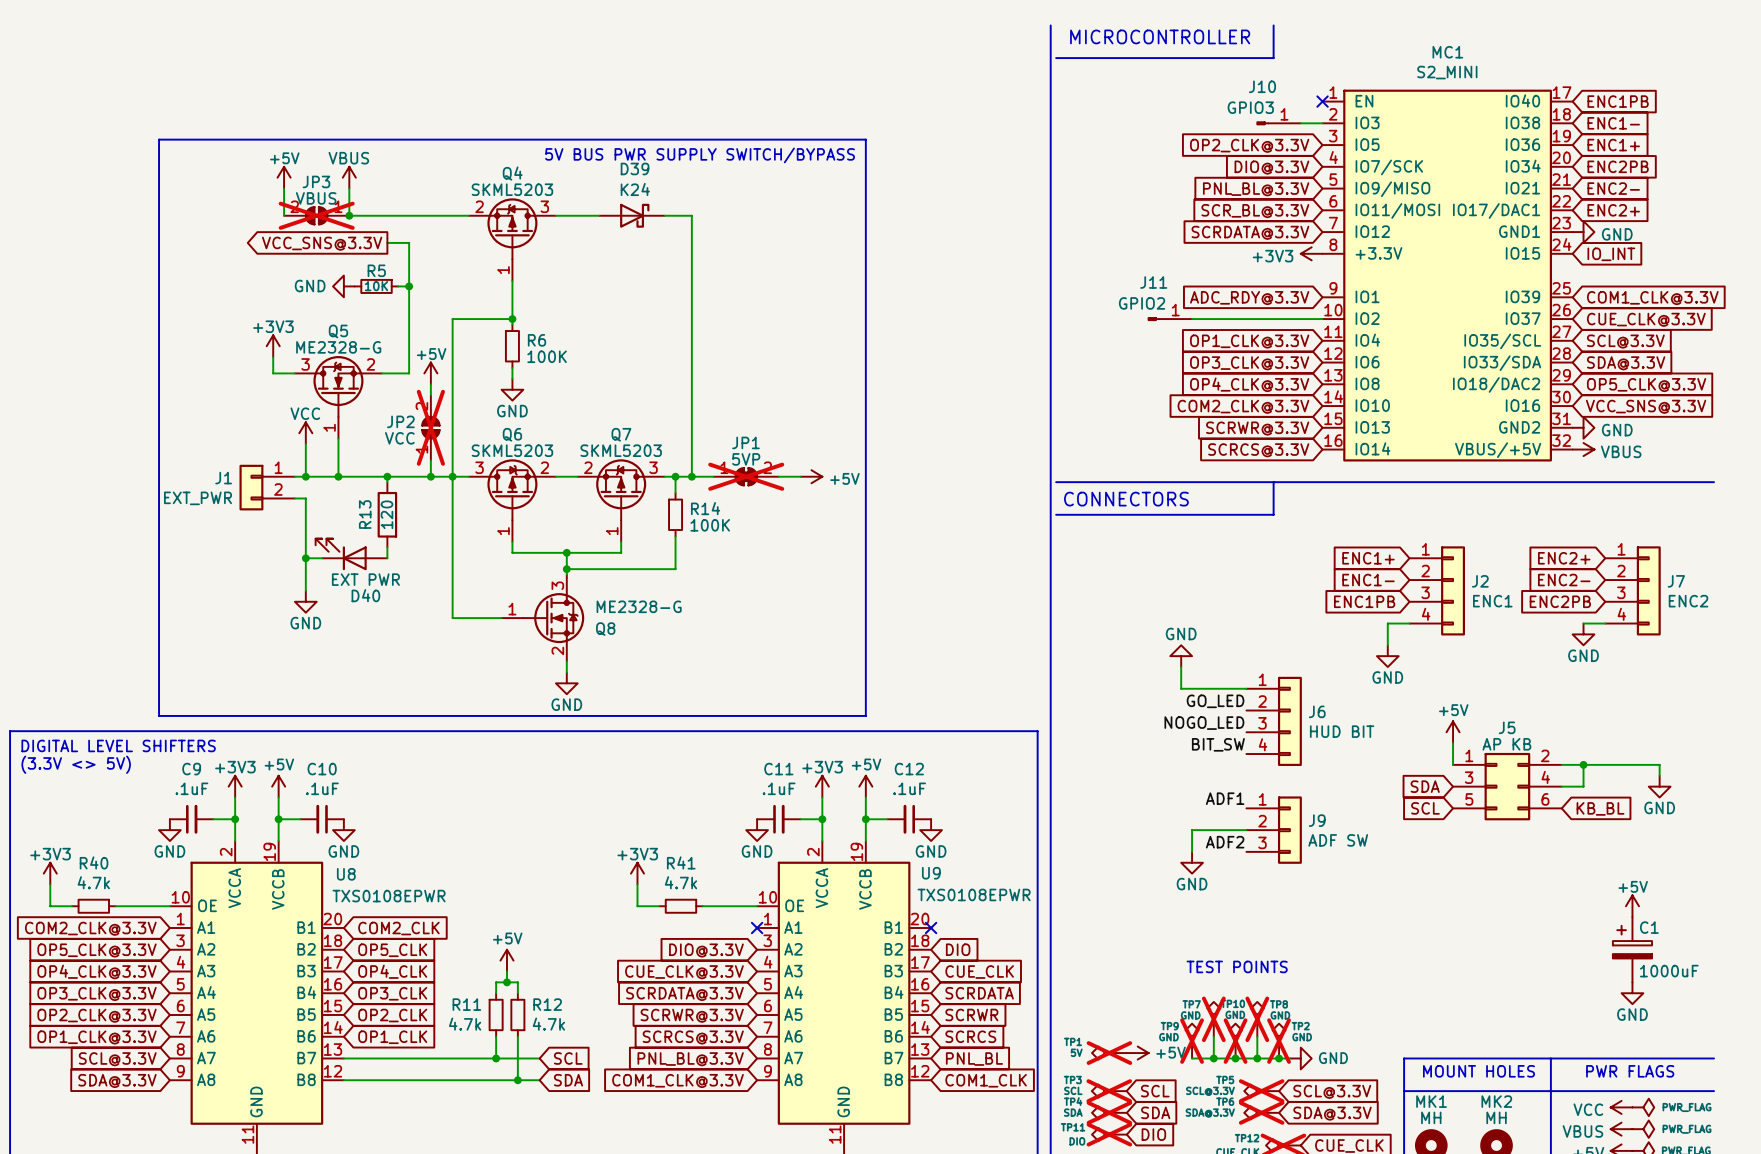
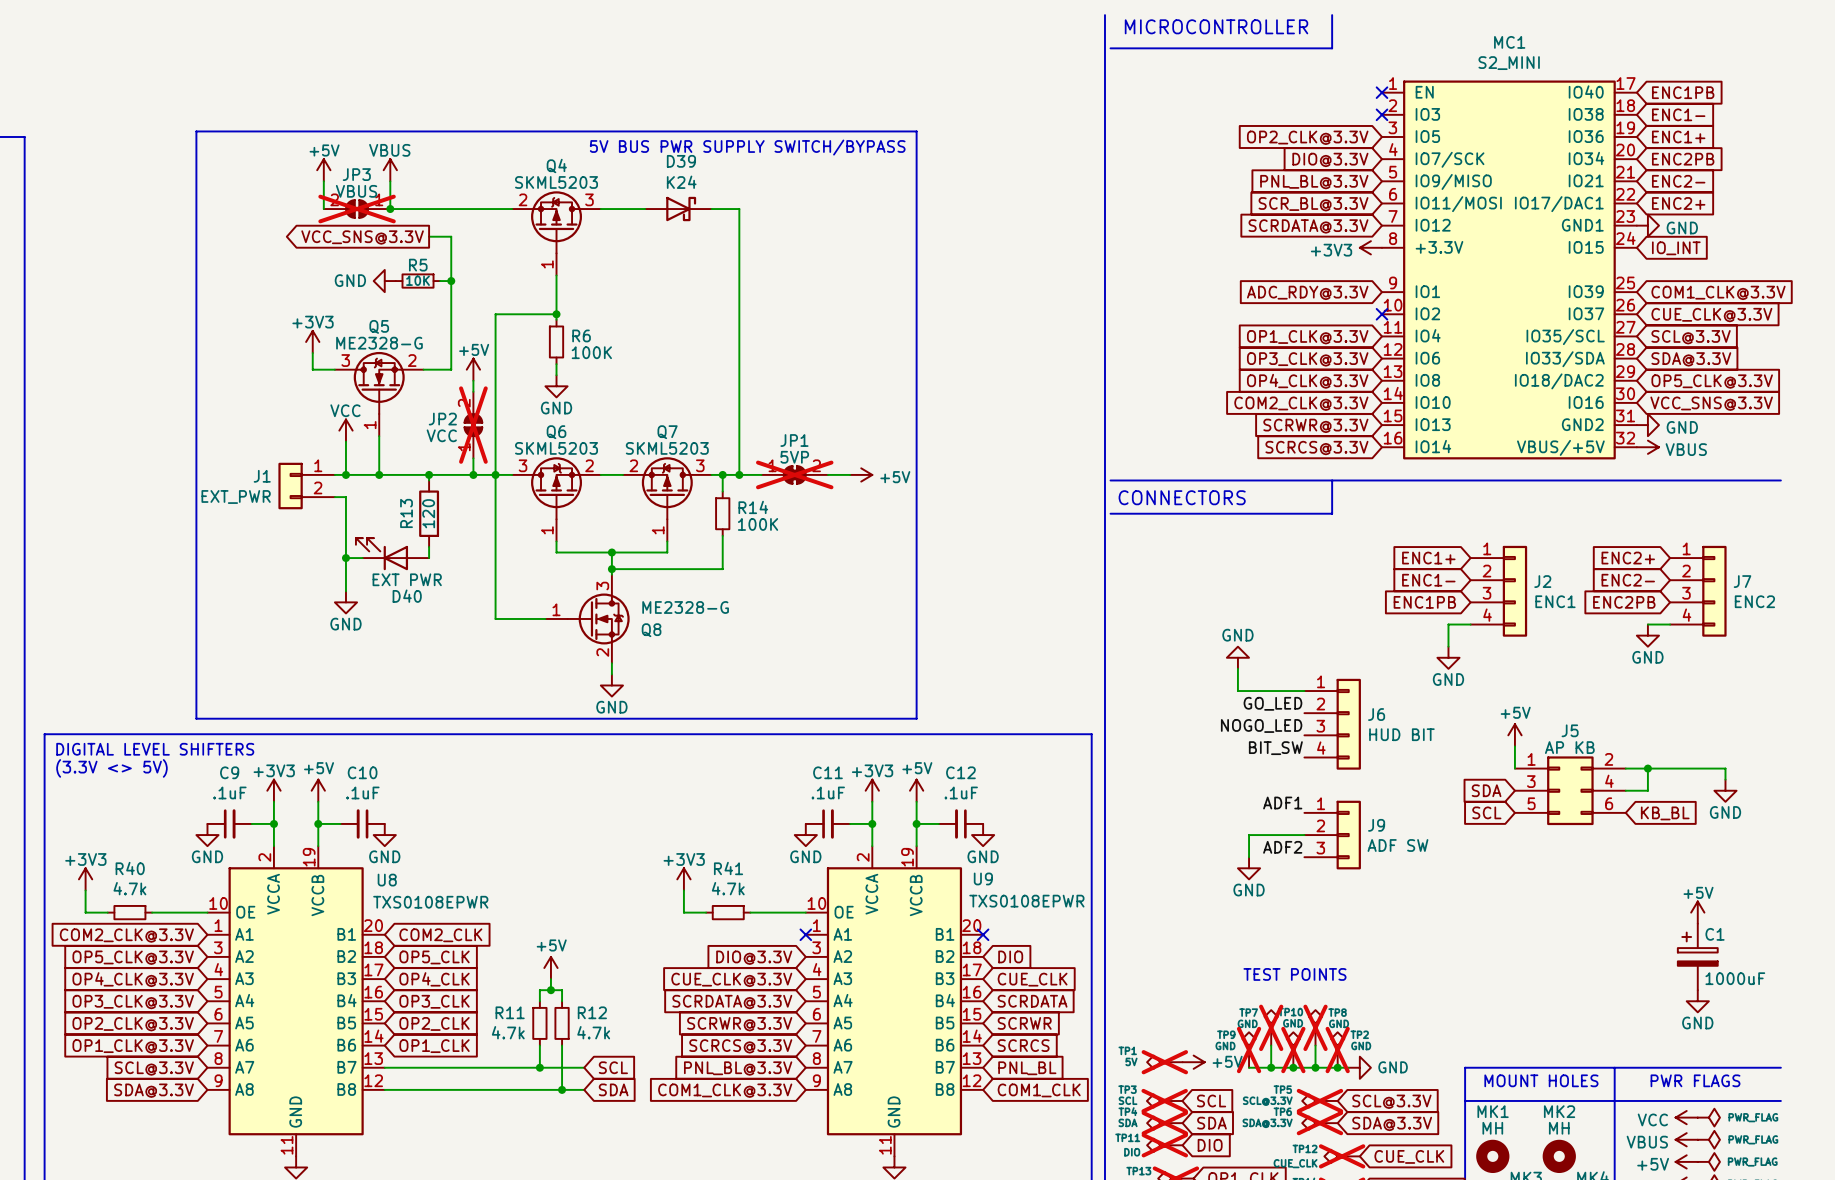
J10: GPIO3 (1278, 123) -> none
wire: (1300, 123) (1322, 123) -> none
no-connect mark: none -> (1382, 114)
J11: GPIO2 (1169, 319) -> none
wire: (1192, 319) (1322, 319) -> none
no-connect mark: none -> (1382, 314)

